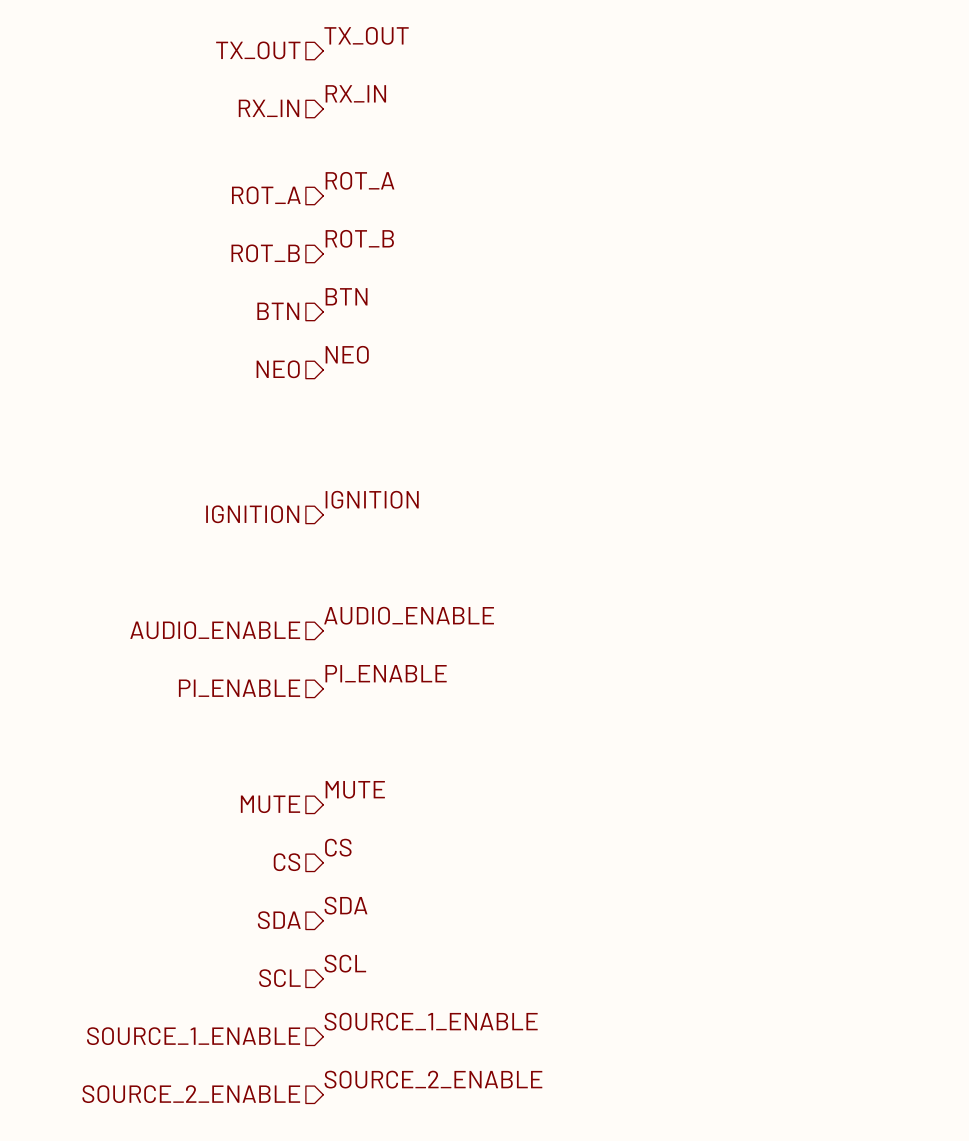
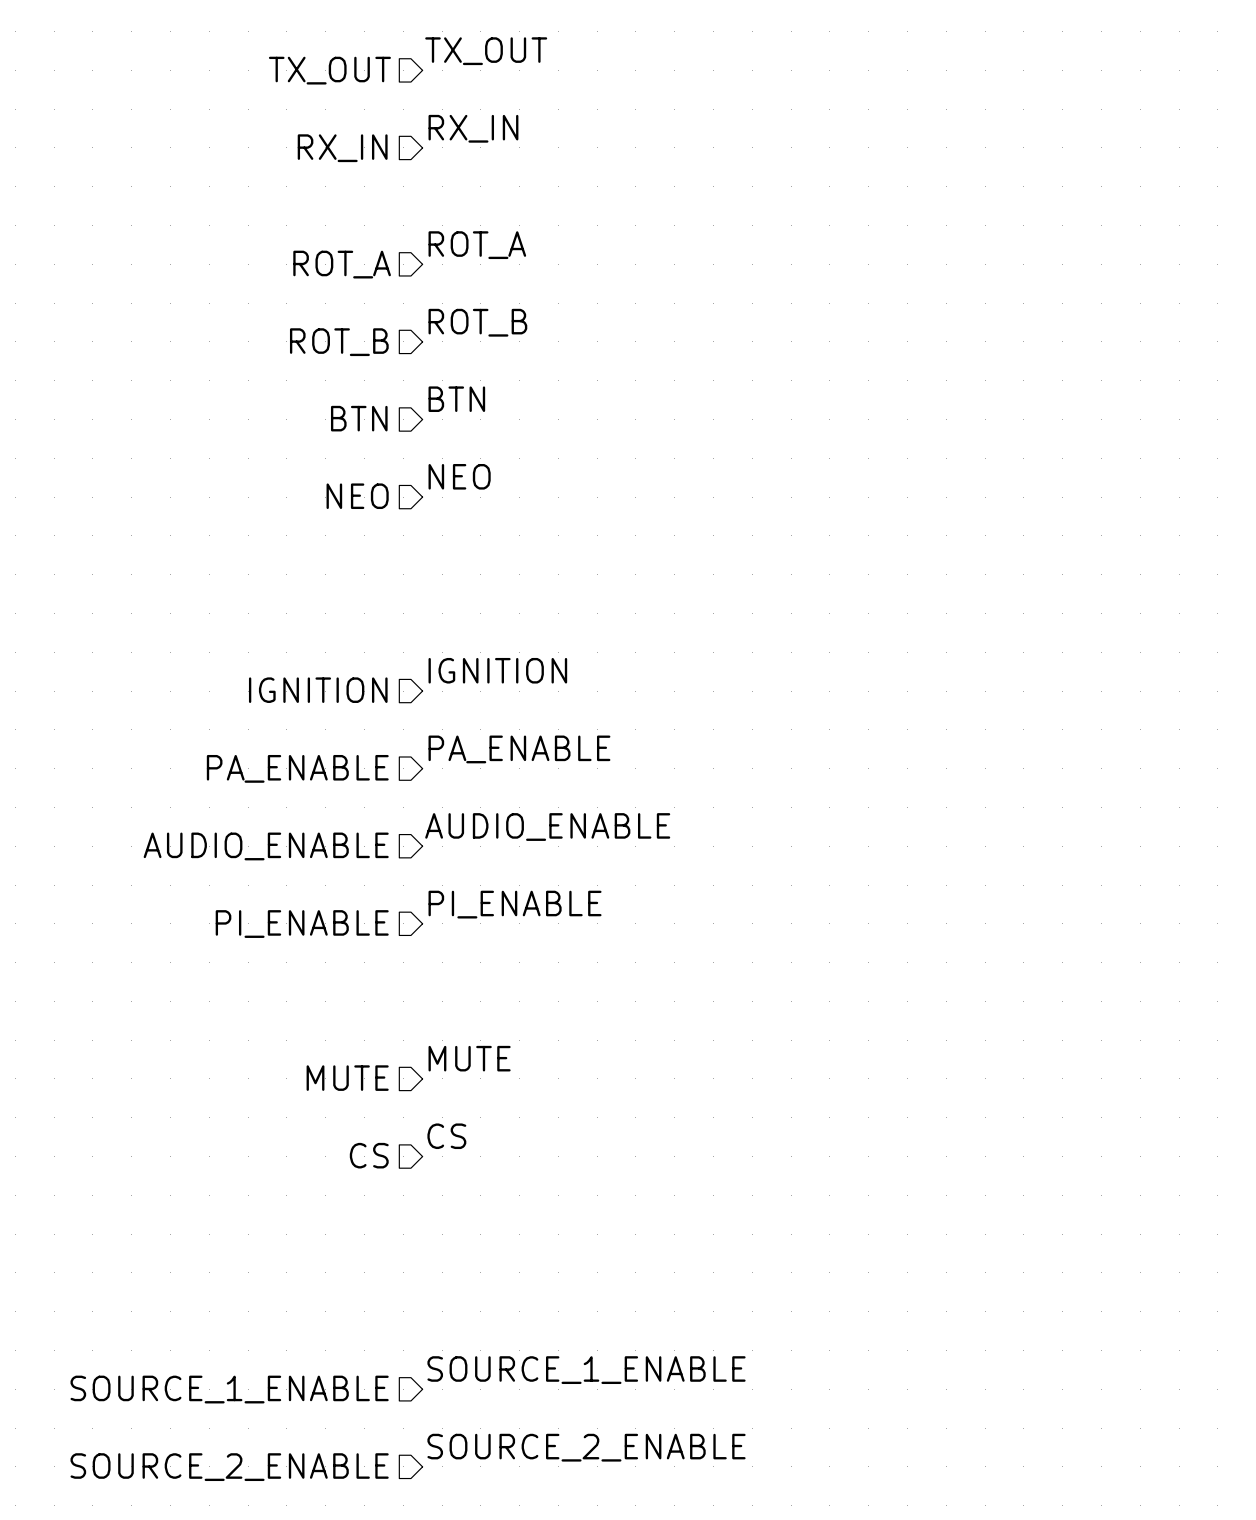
label: none -> PA_ENABLE (519, 749)
hierarchical label: none -> PA_ENABLE (297, 768)
label: SDA (345, 905) -> none
hierarchical label: SDA (279, 920) -> none
label: SCL (345, 963) -> none
hierarchical label: SCL (279, 978) -> none

